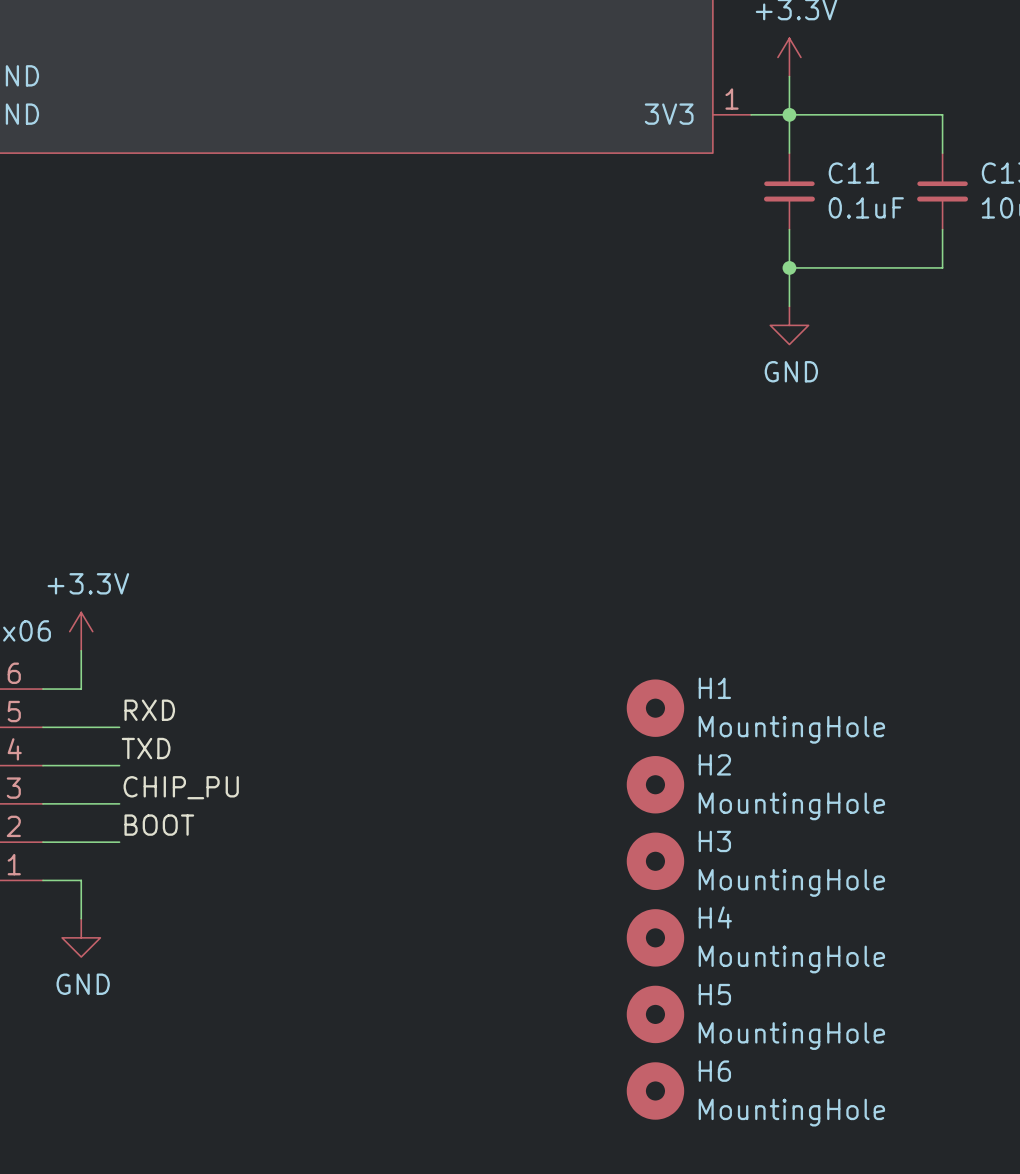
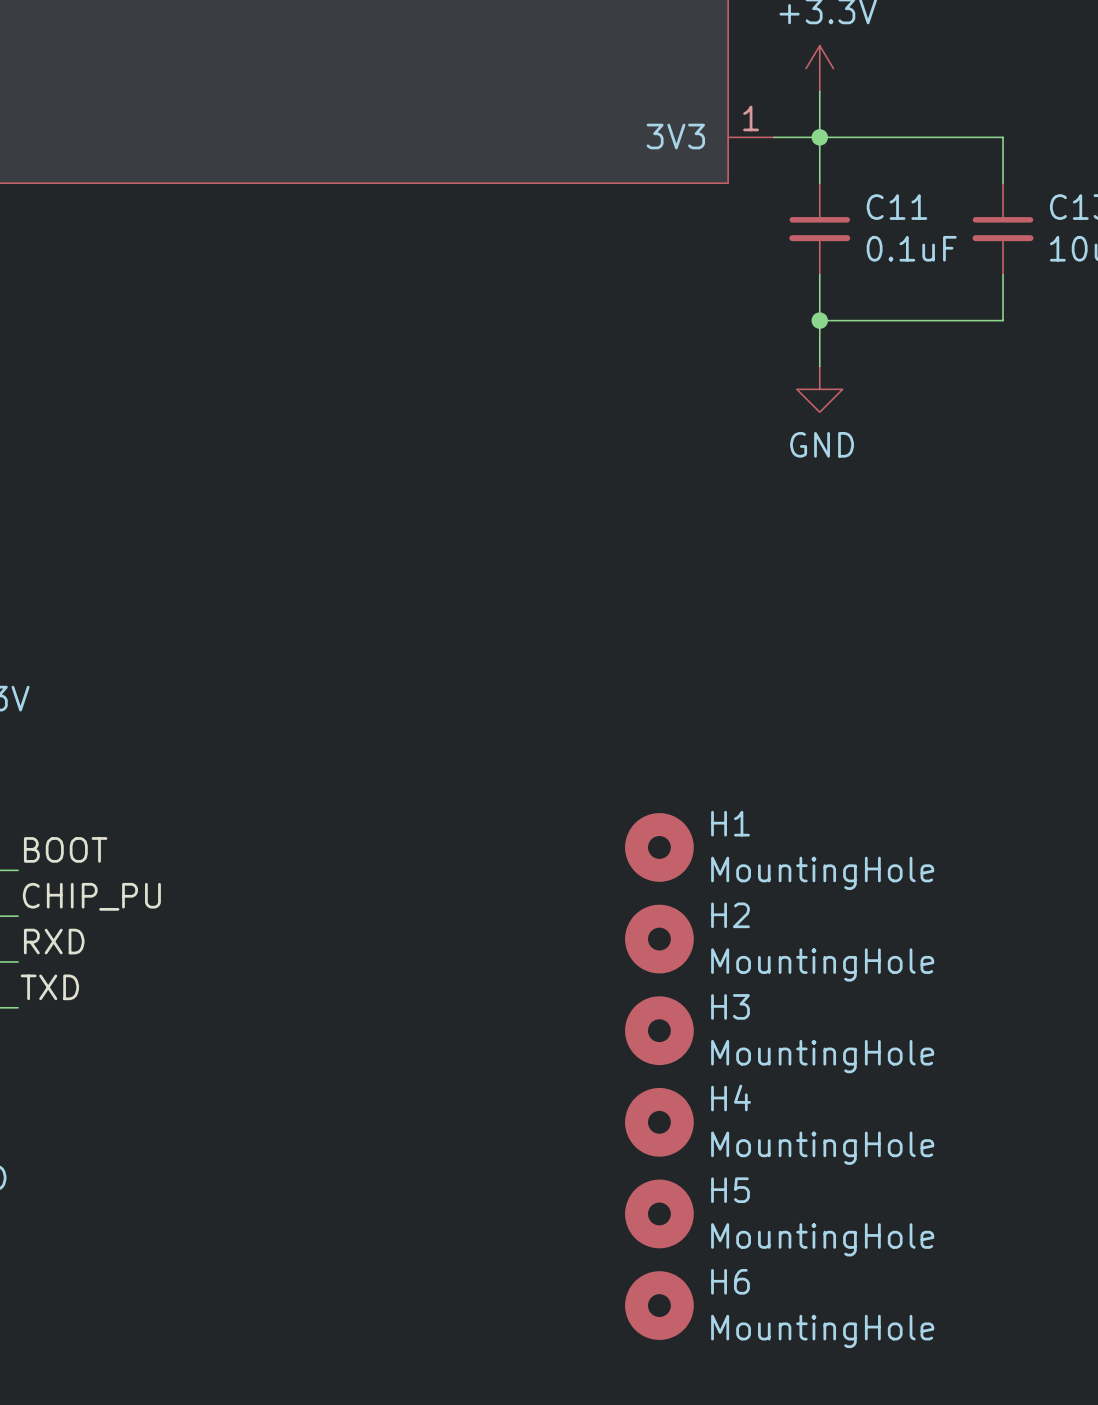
label: RXD (149, 710) -> BOOT (65, 849)
label: TXD (146, 748) -> CHIP_PU (91, 896)
label: CHIP_PU (181, 787) -> RXD (54, 941)
label: BOOT (159, 825) -> TXD (49, 987)

